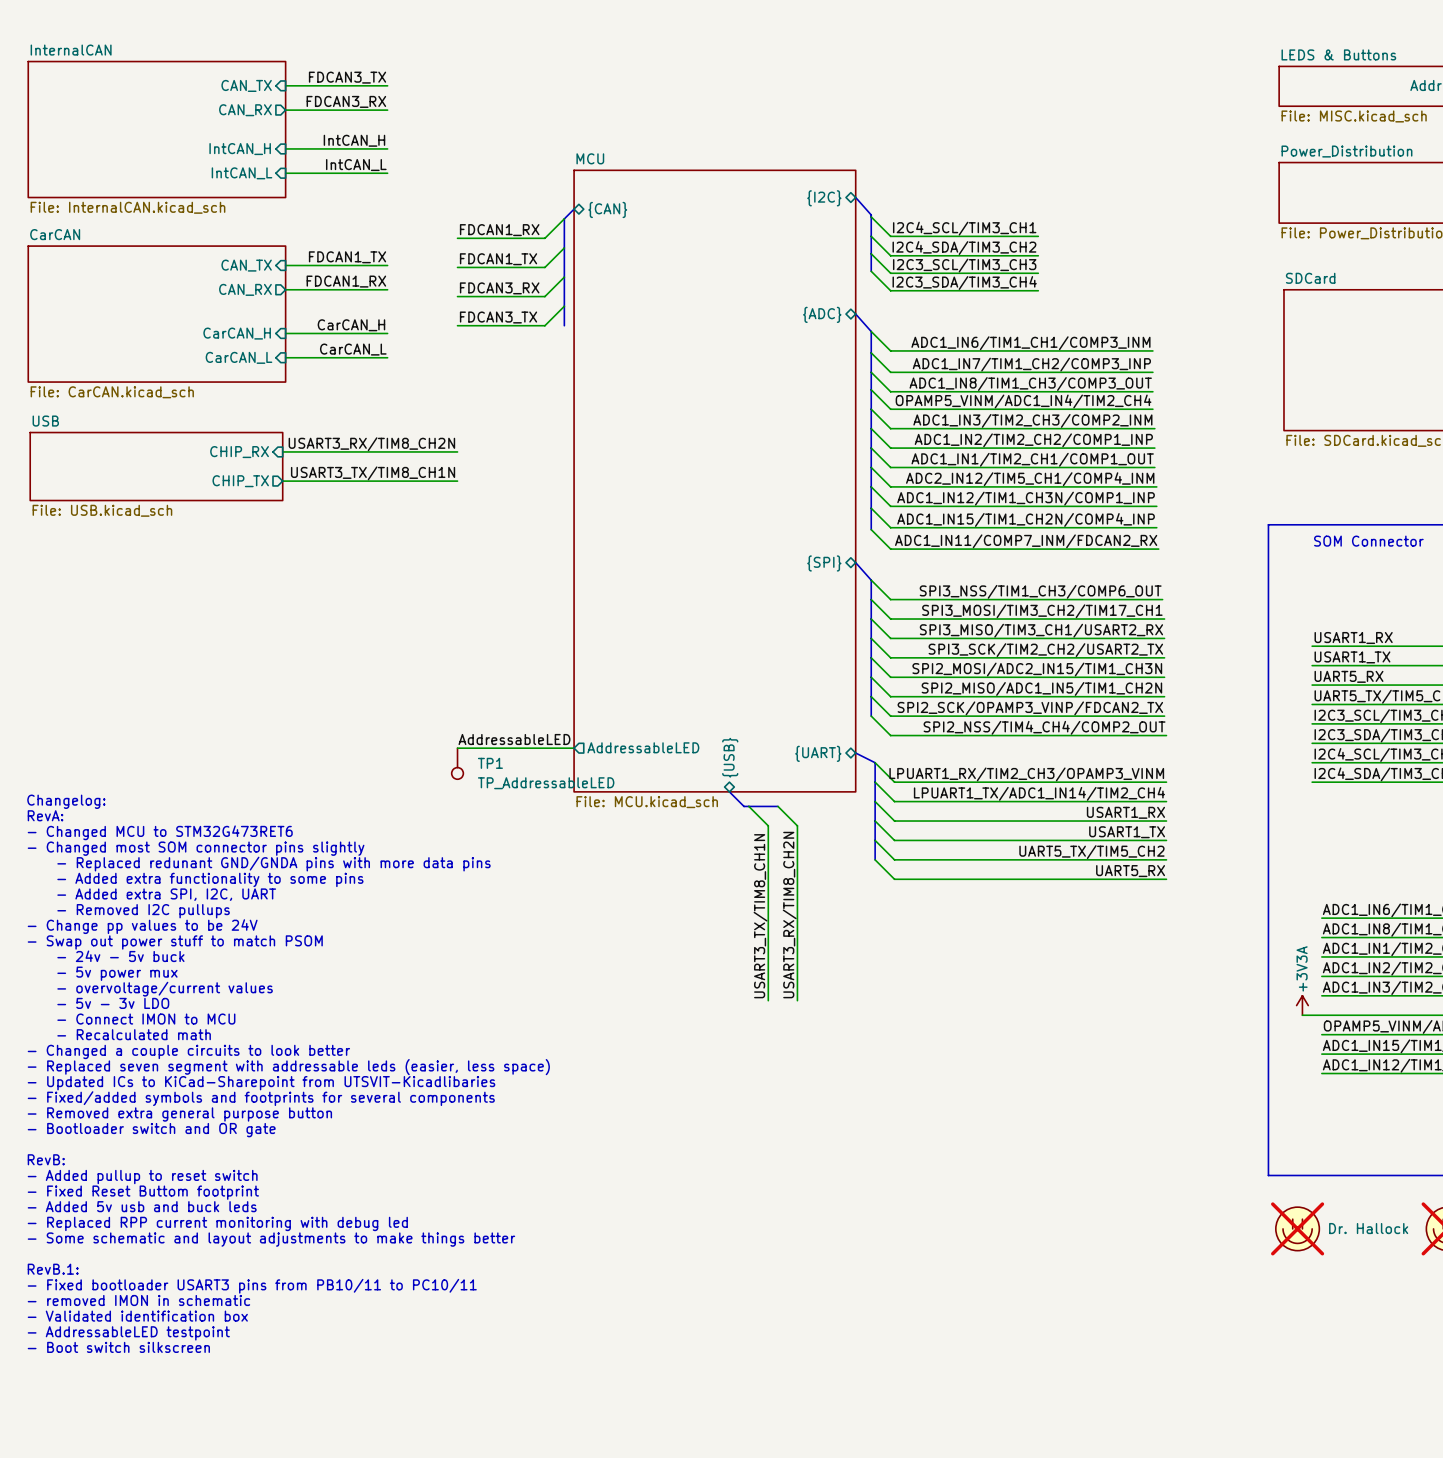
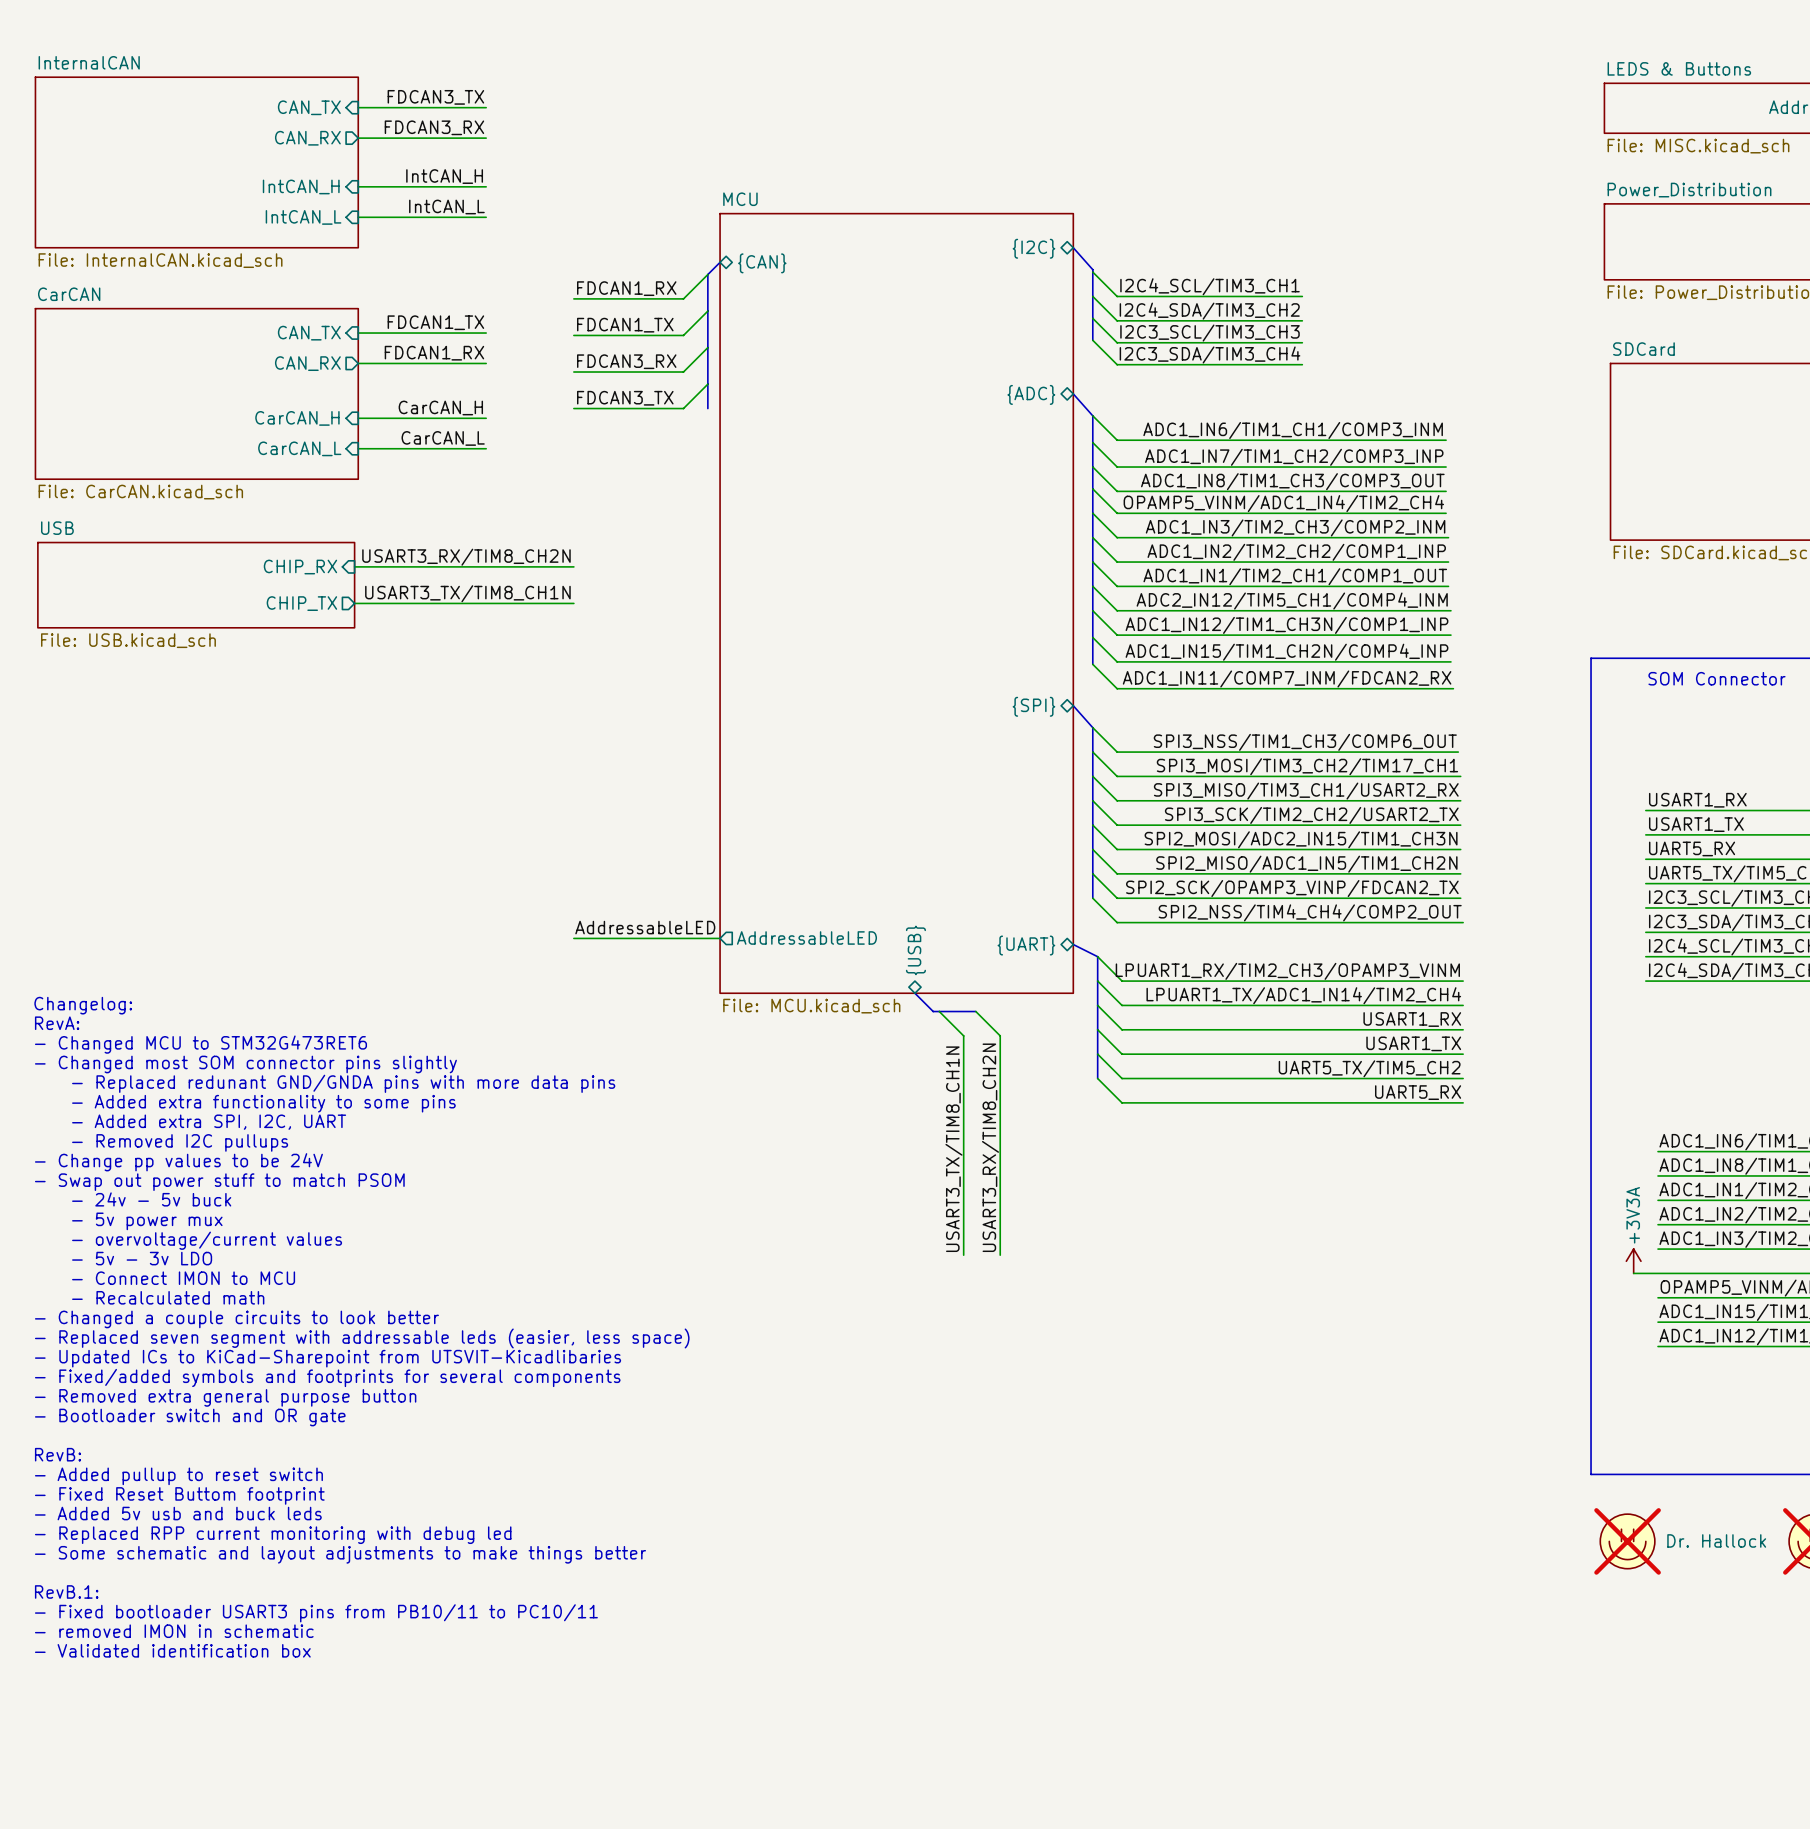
TP1: TP_AddressableLED (457, 763) -> none
text: - AddressableLED testpoint (128, 1333) -> none
text: - Boot switch silkscreen (118, 1347) -> none

